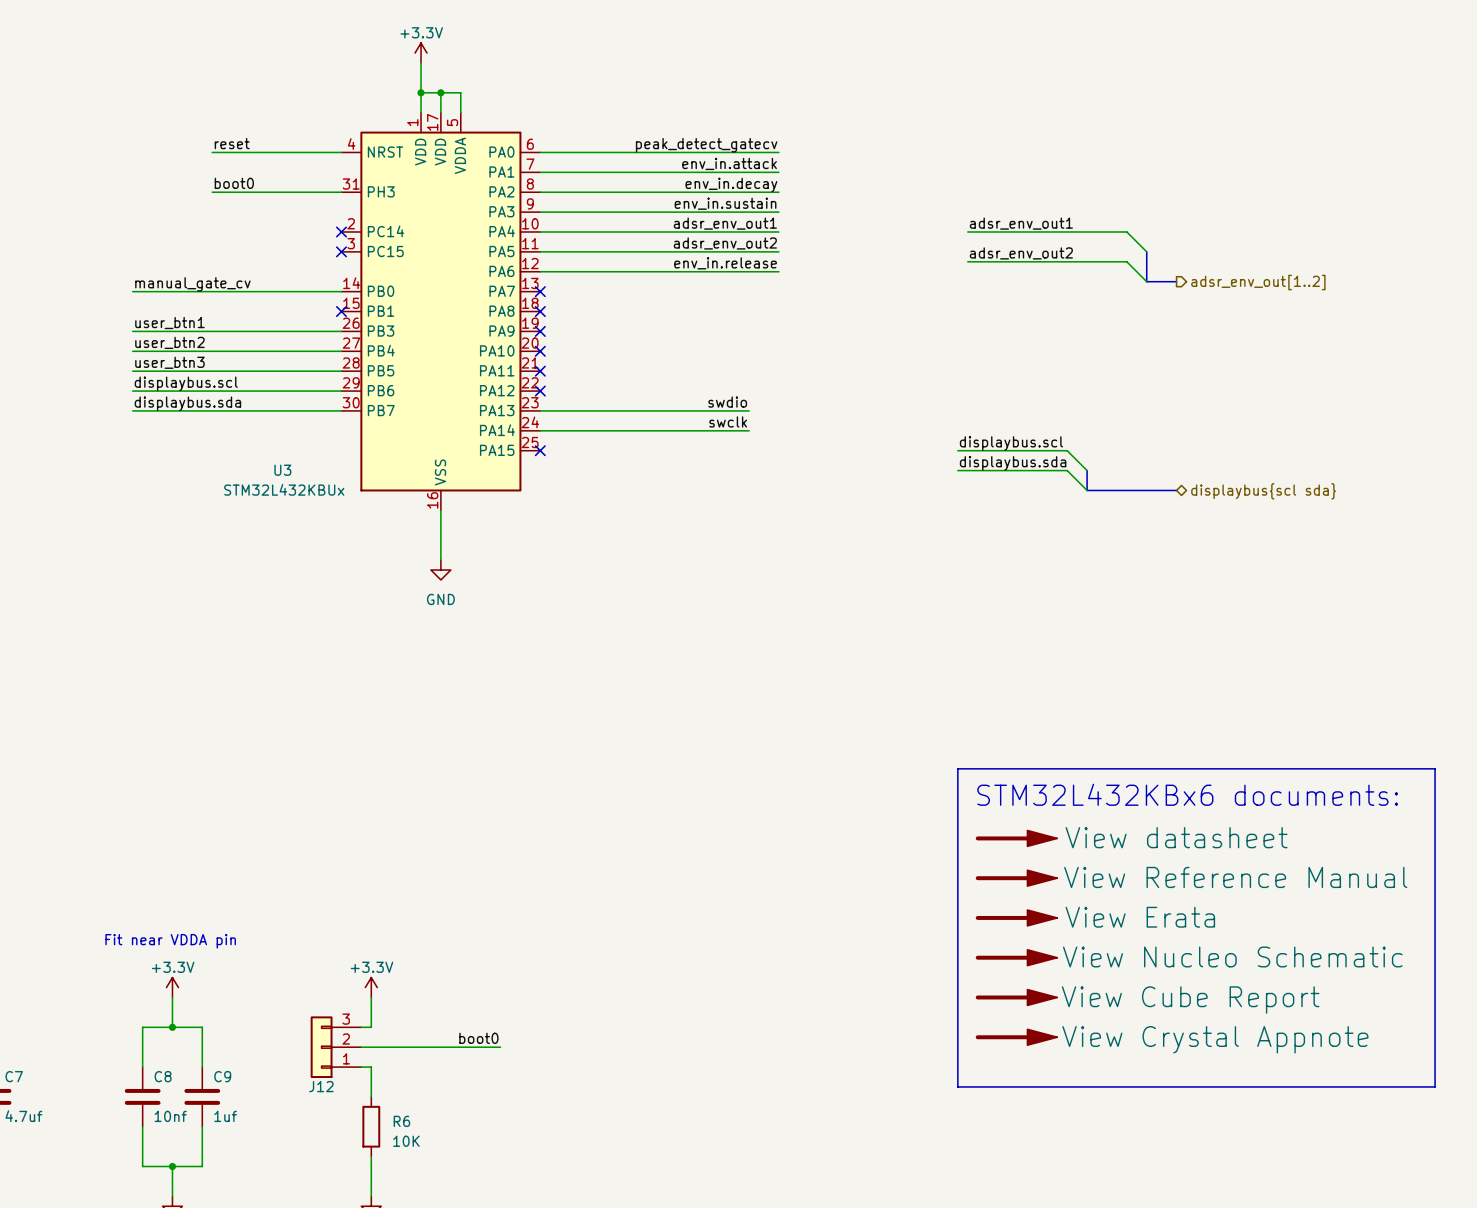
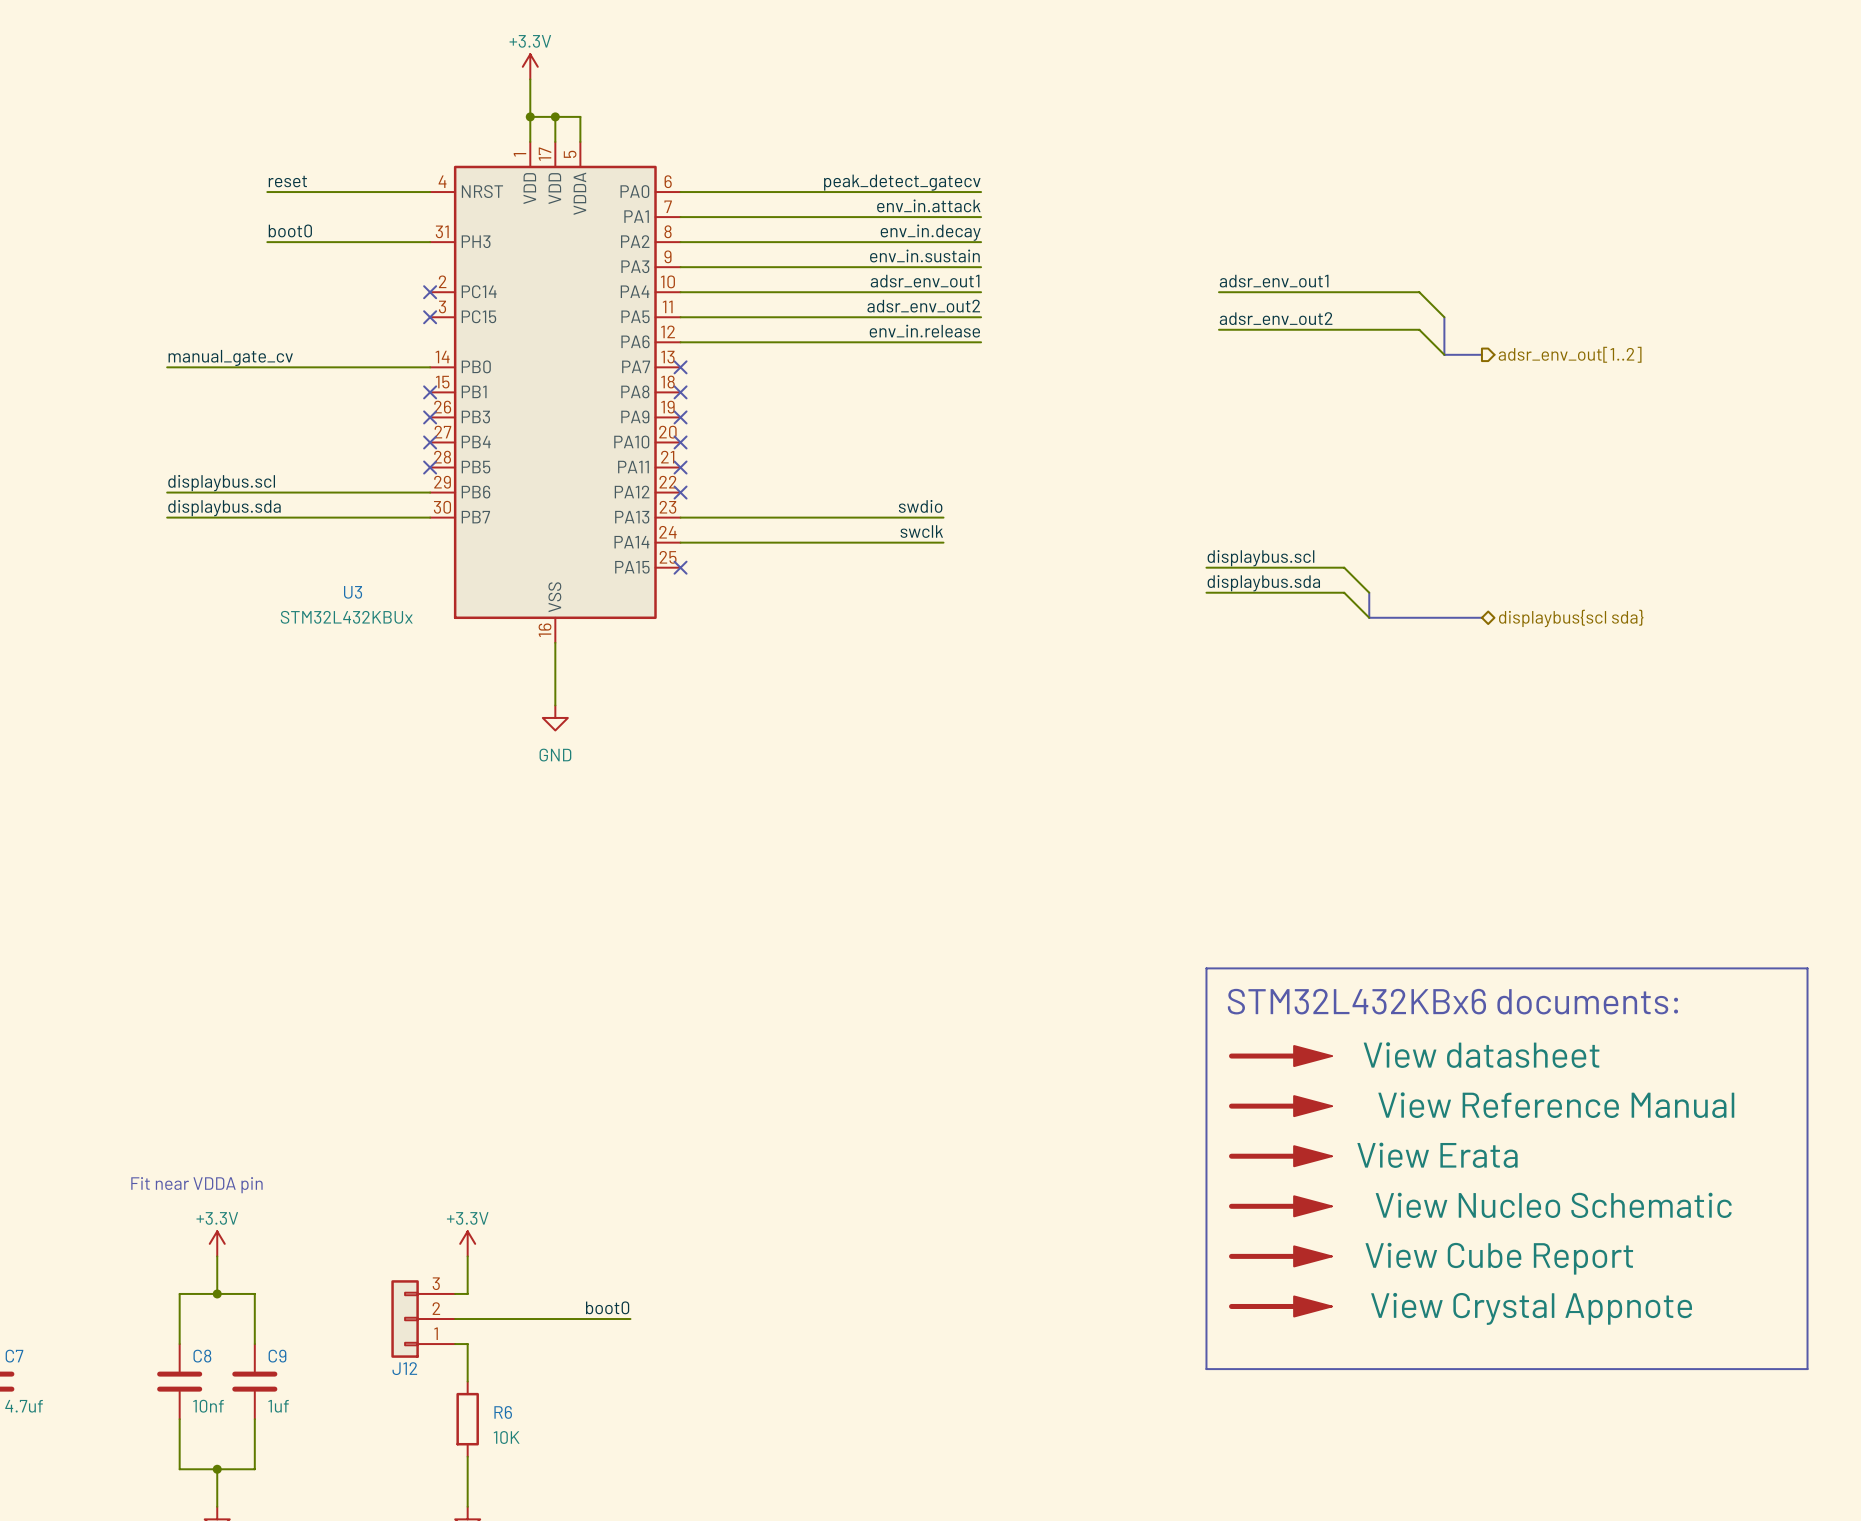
label: user_btn1 (169, 323) -> none
wire: (132, 331) (341, 331) -> none
no-connect mark: none -> (430, 417)
label: user_btn2 (169, 342) -> none
wire: (132, 351) (341, 351) -> none
no-connect mark: none -> (430, 442)
label: user_btn3 (169, 362) -> none
wire: (132, 371) (341, 371) -> none
no-connect mark: none -> (430, 467)

